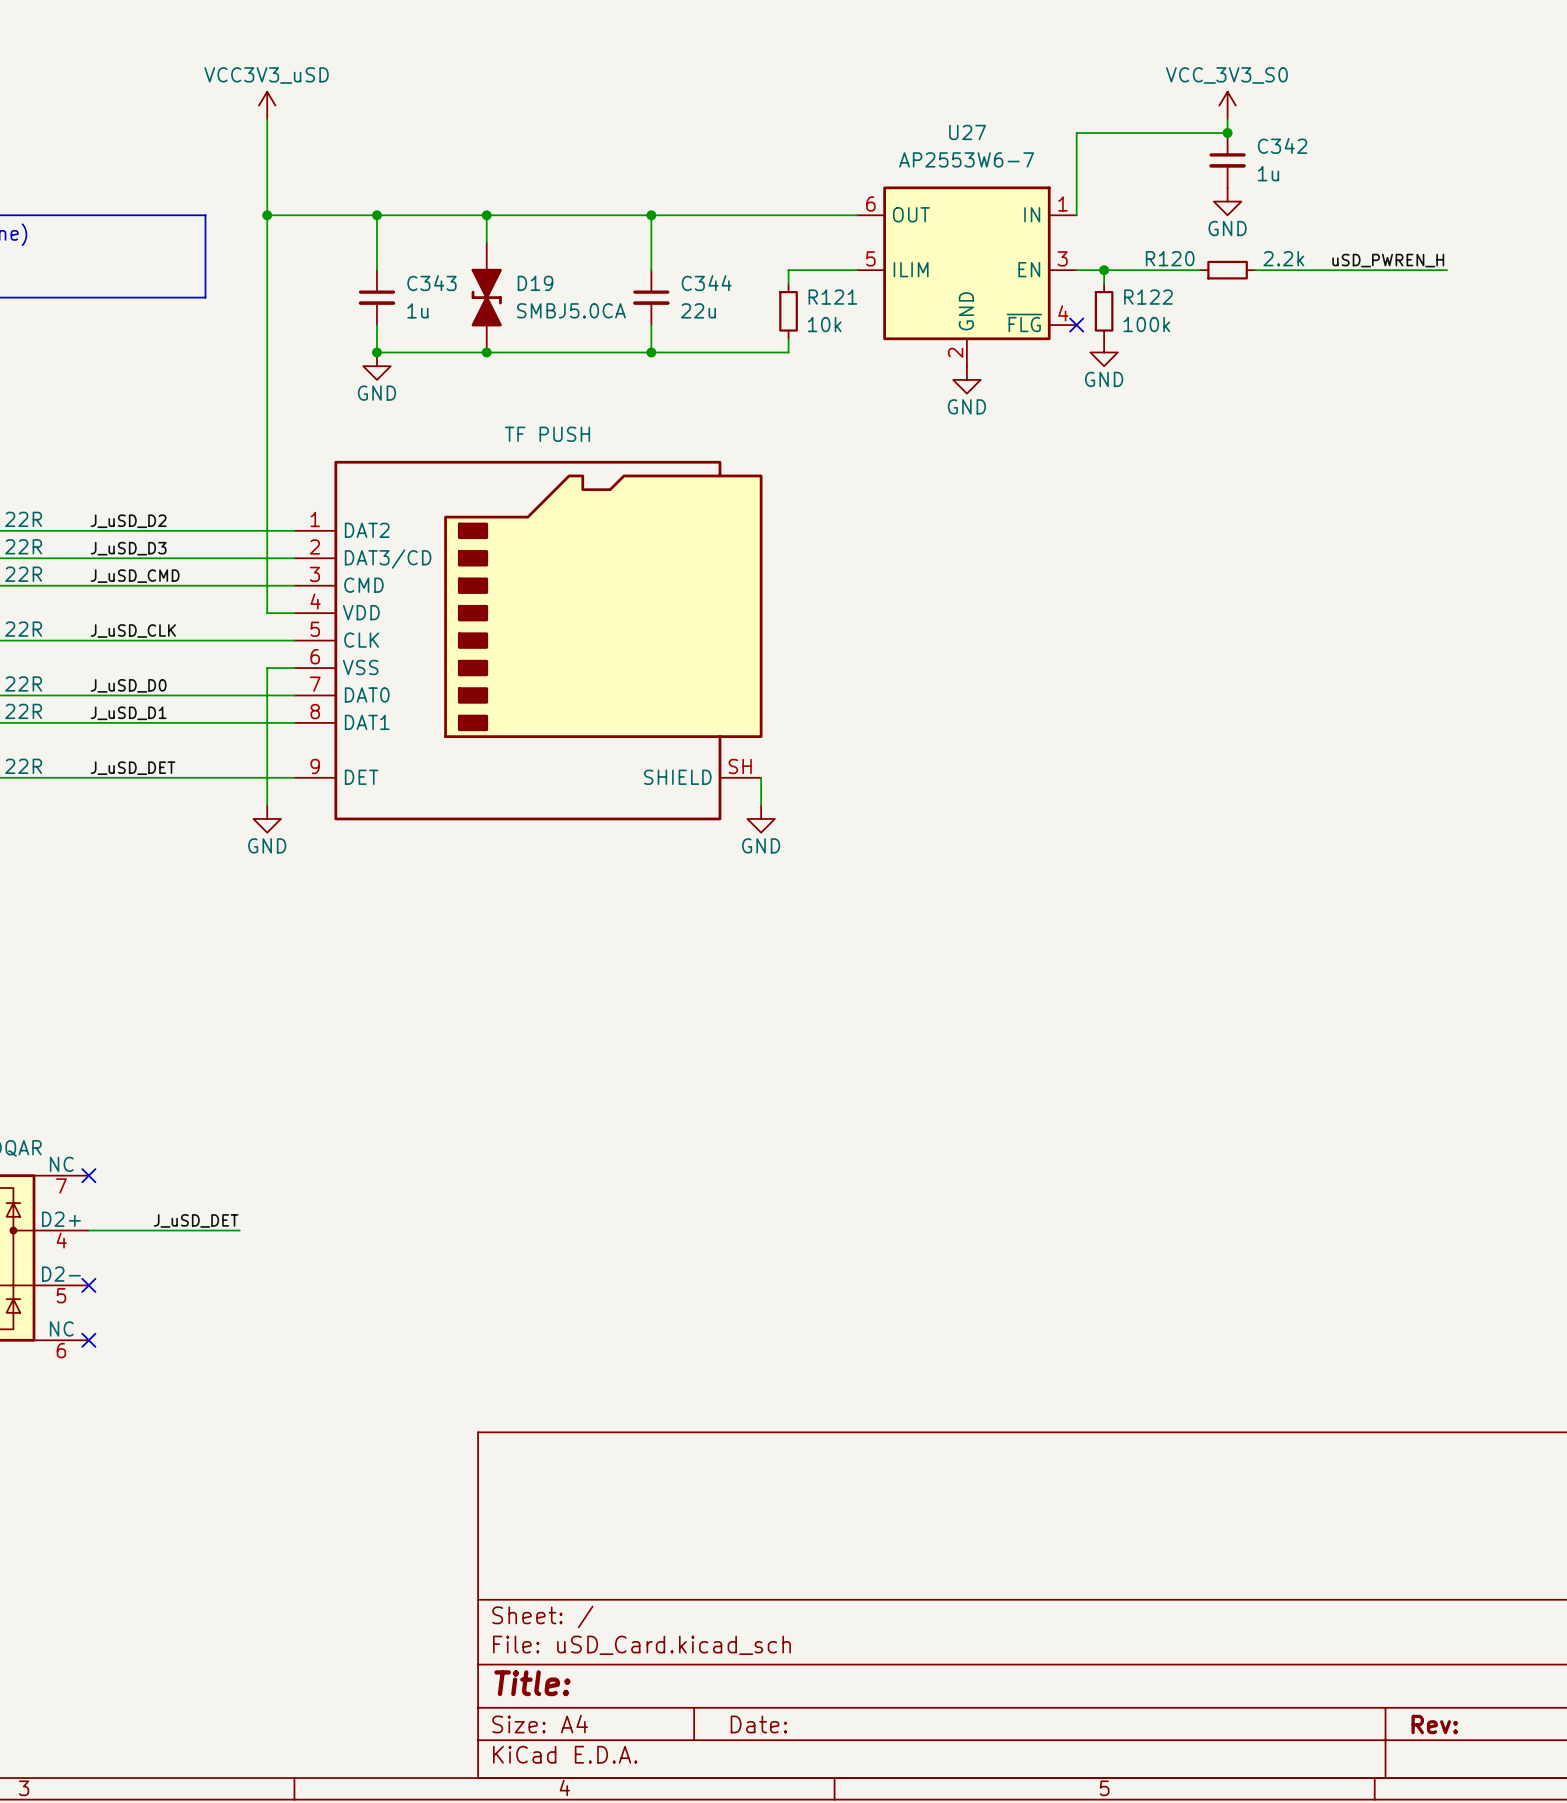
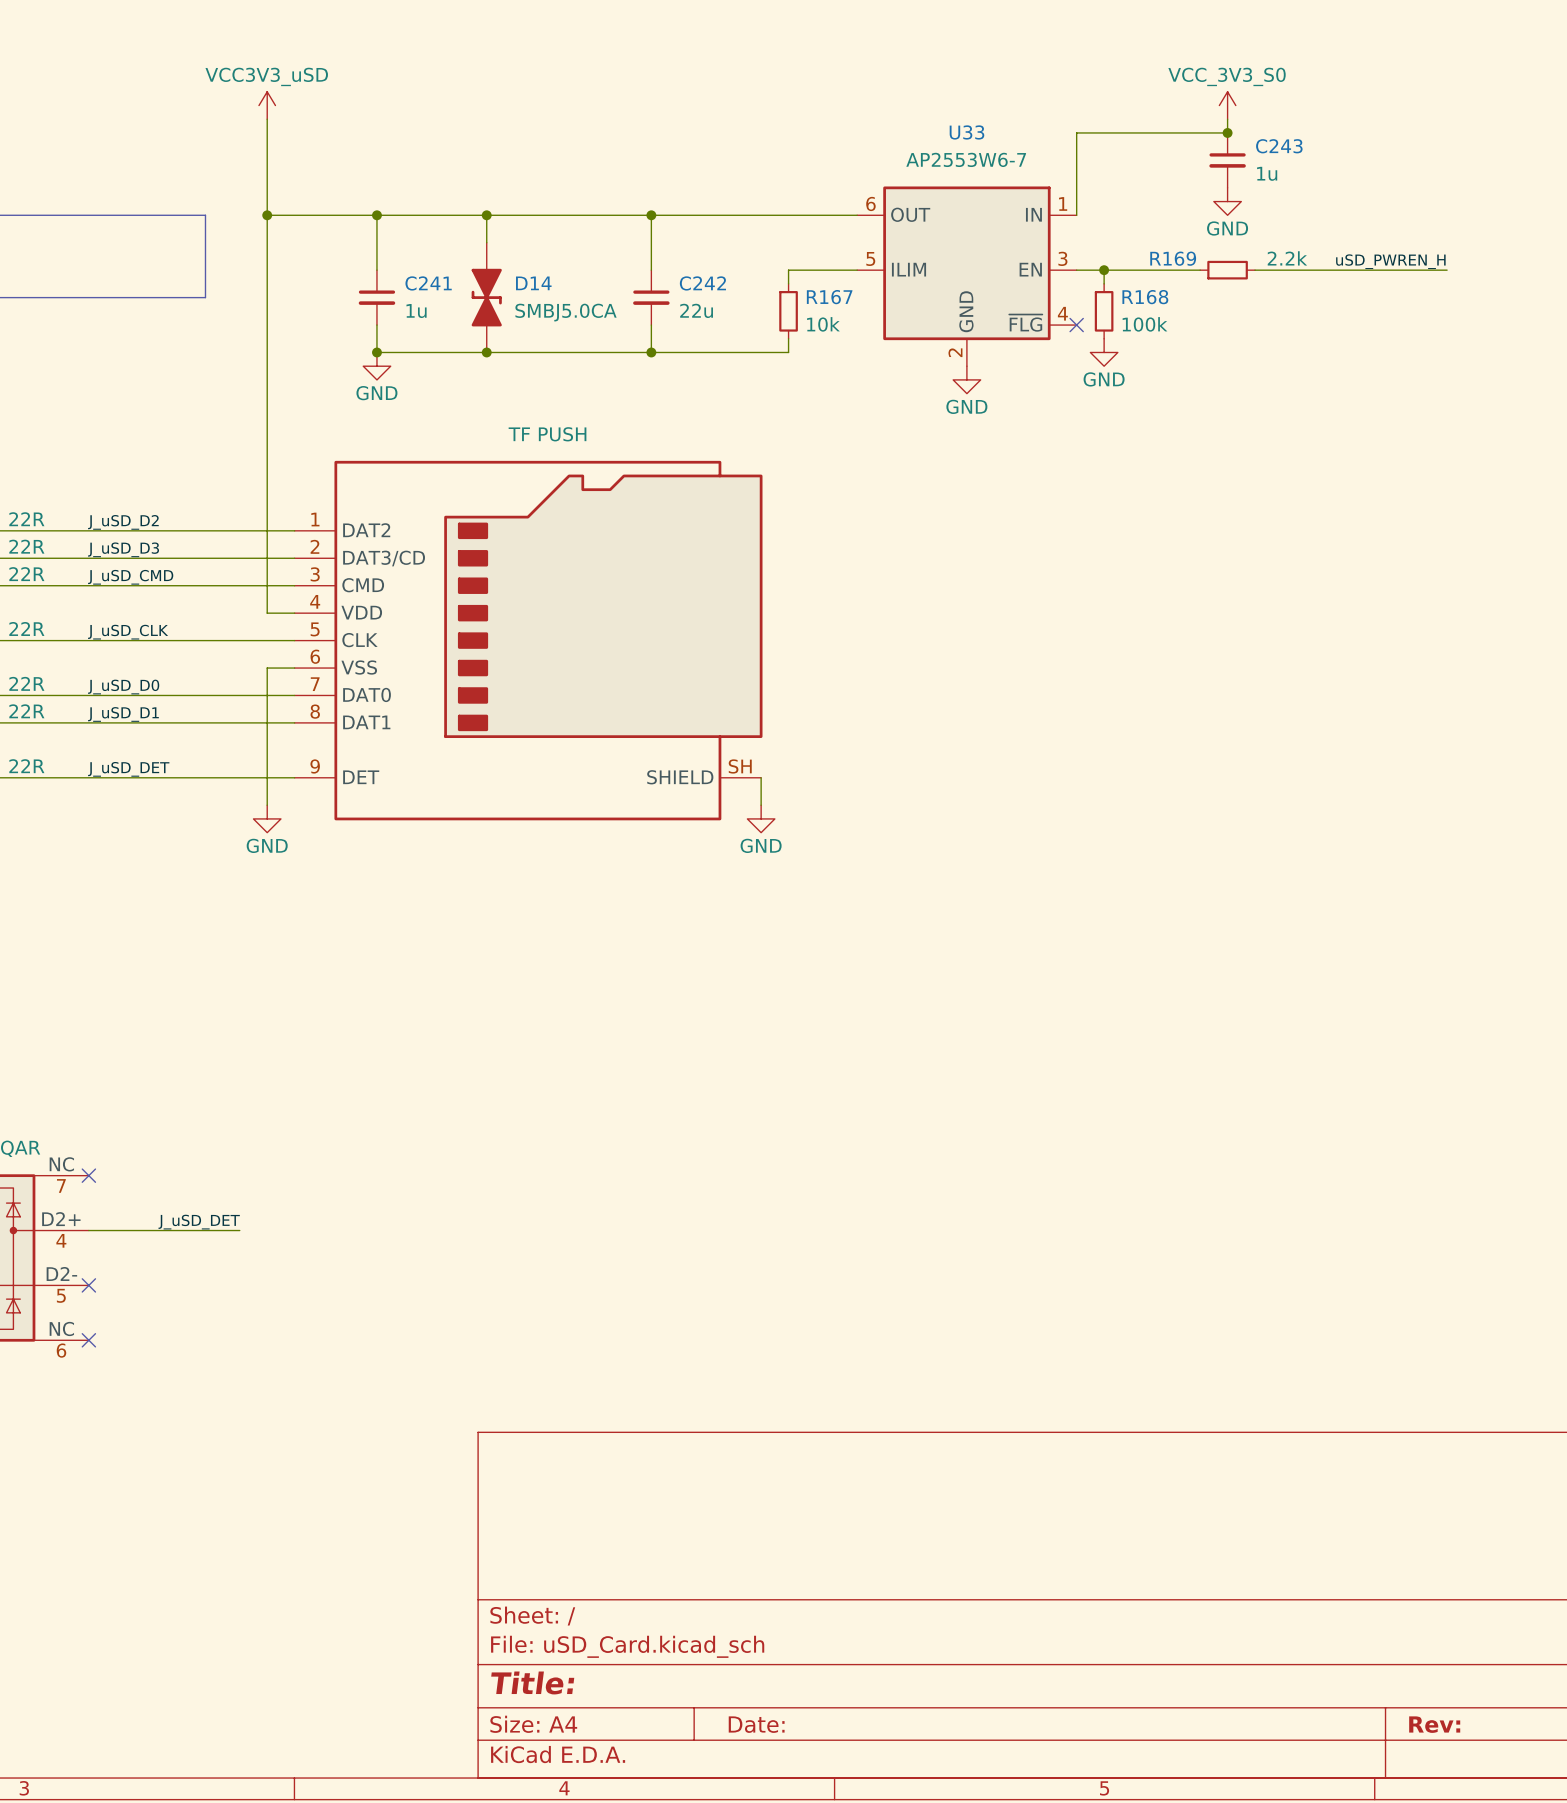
U27 name: U27 (967, 132) -> U33 (966, 132)
C342 name: C342 (1282, 145) -> C243 (1279, 146)
R120 name: R120 (1170, 258) -> R169 (1173, 258)
C343 name: C343 (431, 283) -> C241 (428, 283)
D19 name: D19 (535, 283) -> D14 (533, 283)
C344 name: C344 (706, 283) -> C242 (702, 283)
R121 name: R121 (832, 297) -> R167 (829, 297)
R122 name: R122 (1148, 297) -> R168 (1145, 297)

